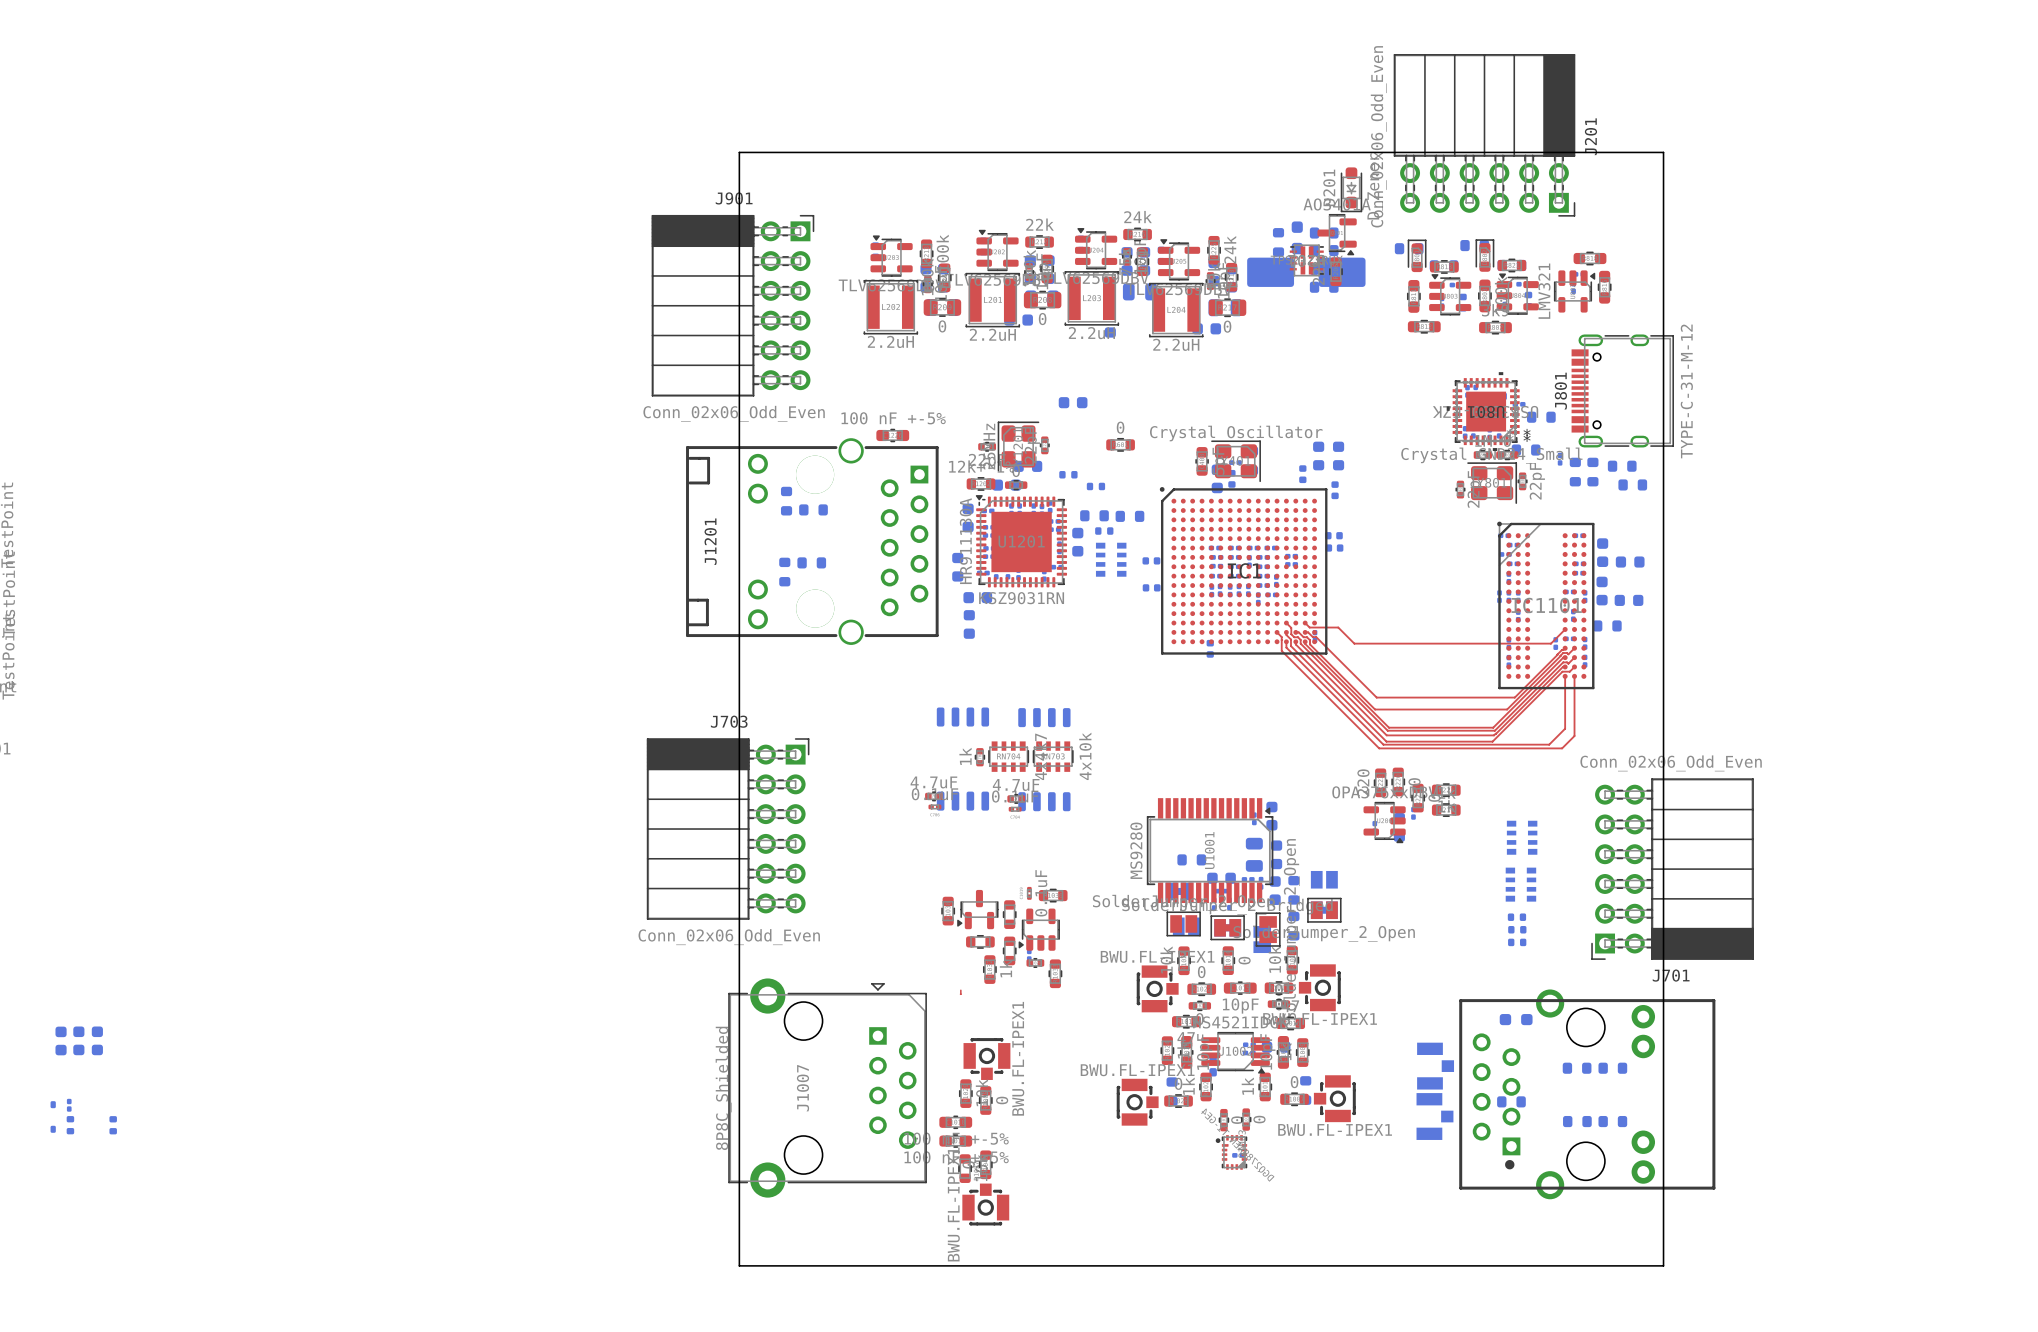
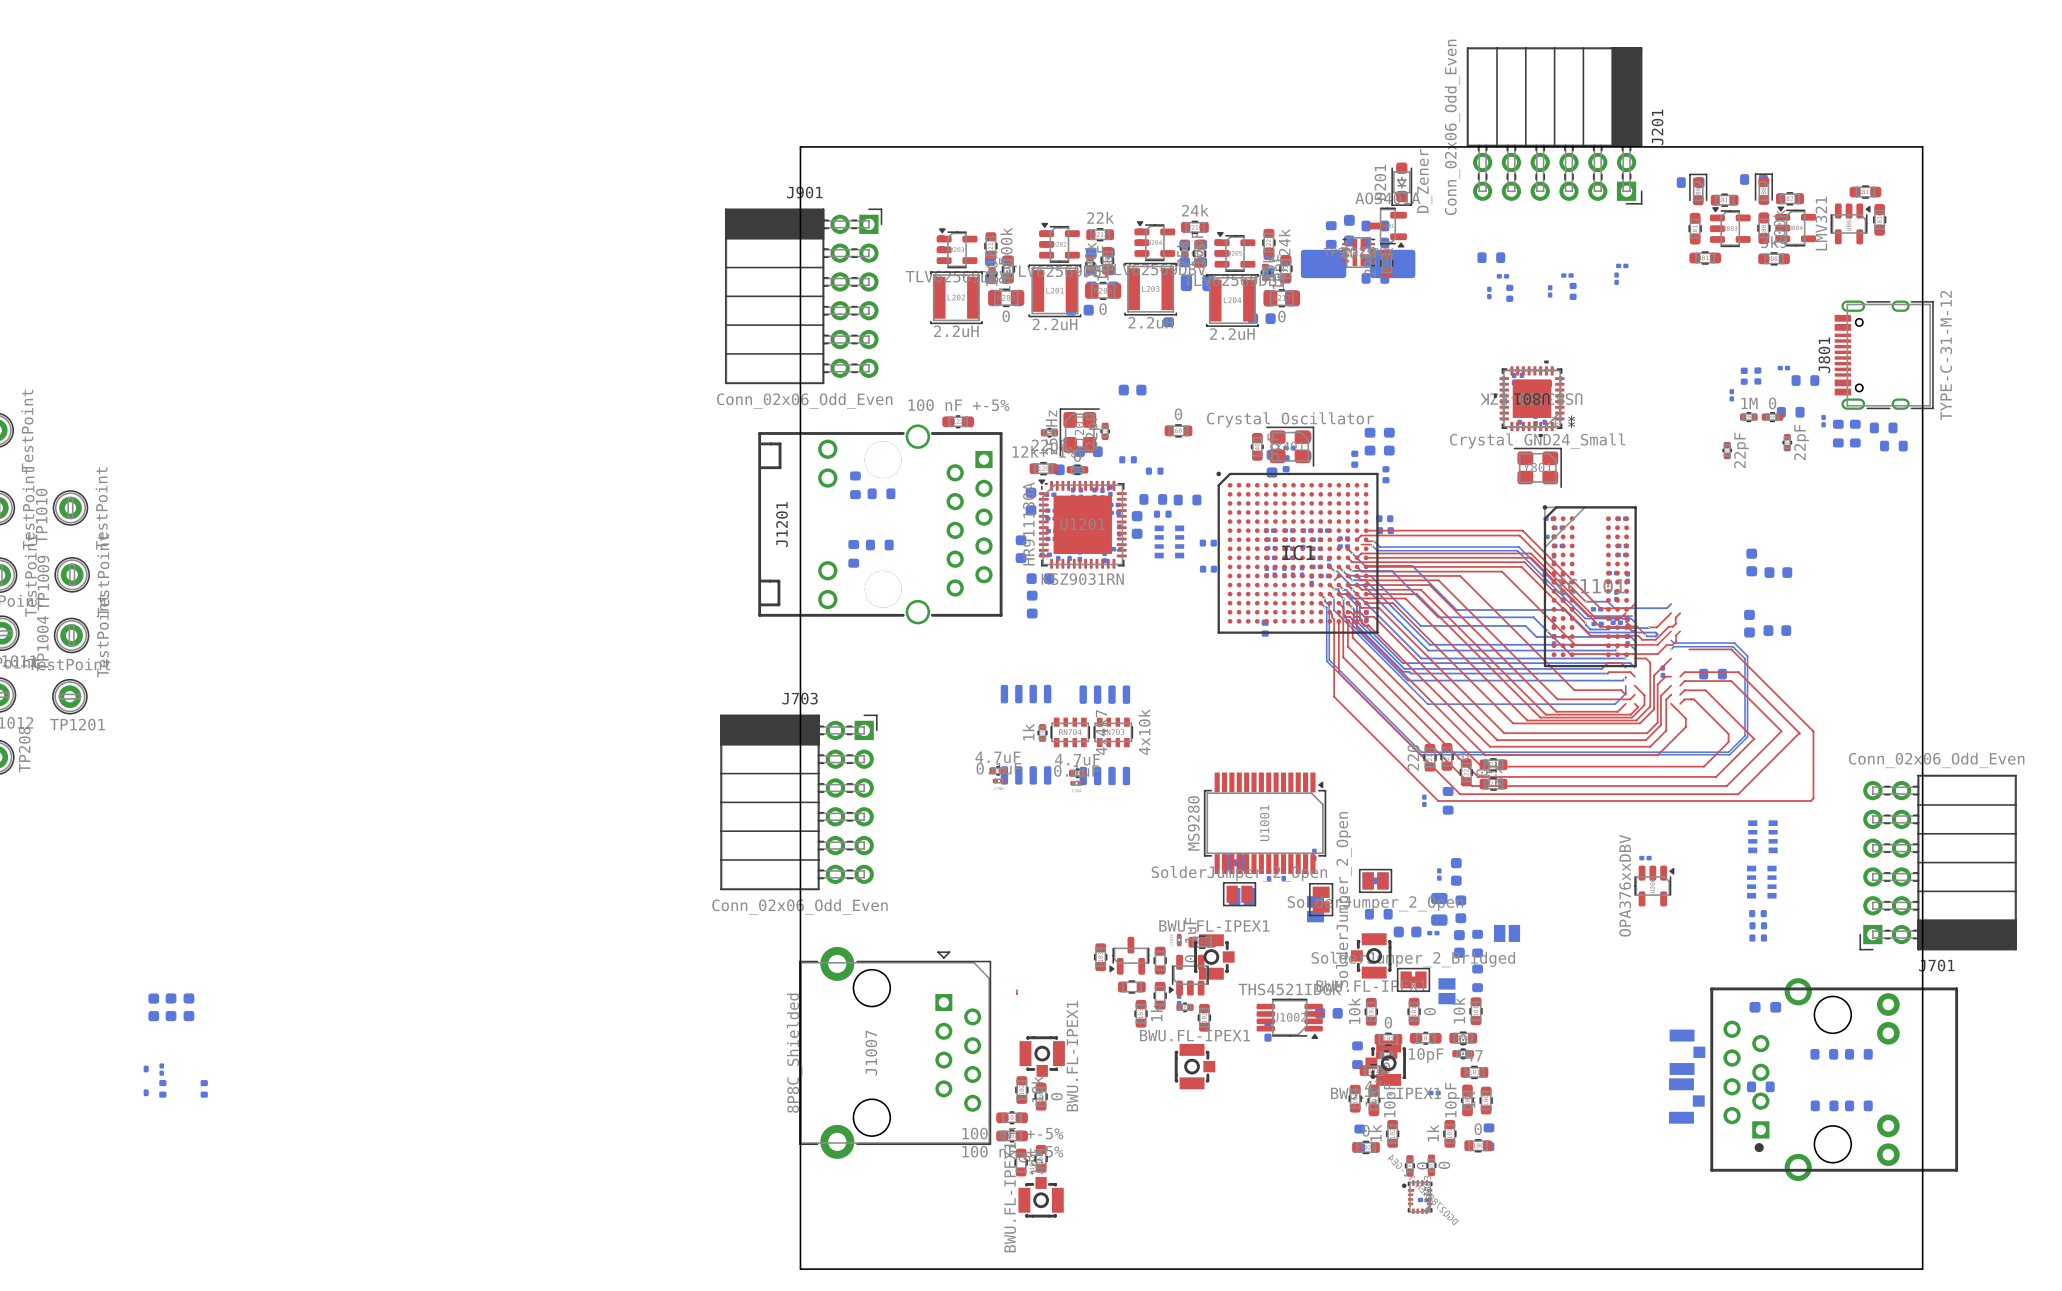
J201 position: (1484, 135) -> (1554, 125)
board edge: (739, 152) (1663, 152) (1663, 1265) (739, 1265) (739, 152) -> (800, 146) (800, 1269) (1922, 1269) (1922, 146) (800, 146)
part: none -> (1753, 179)
part: none -> (1690, 182)
part: (1474, 245) -> none
part: (1409, 248) -> none
part position: (1417, 255) -> (1698, 189)
part position: (1484, 255) -> (1763, 189)
part position: (1589, 258) -> (1865, 192)
part position: (1511, 265) -> (1789, 198)
part position: (1444, 266) -> (1724, 200)
part position: (1604, 287) -> (1879, 219)
part position: (1574, 291) -> (1850, 223)
part position: (1450, 294) -> (1730, 227)
part position: (1517, 294) -> (1795, 226)
part position: (1484, 295) -> (1763, 228)
part position: (1413, 296) -> (1695, 228)
part position: (1424, 326) -> (1705, 258)
part position: (1495, 327) -> (1774, 258)
part: none -> (1783, 368)
part: none -> (1744, 376)
part: none -> (1757, 376)
J801 position: (1622, 390) -> (1884, 355)
part: none -> (1805, 380)
part: (1519, 404) -> none
part: none -> (1731, 395)
part: (1541, 417) -> none
part: none -> (1790, 412)
part: (1465, 432) -> none
part: none -> (1823, 421)
part: none -> (1883, 427)
part: none -> (1838, 433)
part: none -> (1855, 433)
part: (1526, 450) -> none
part position: (1482, 455) -> (1748, 417)
part position: (1507, 455) -> (1772, 417)
part: (1560, 459) -> none
part: none -> (1893, 446)
part: (1622, 466) -> none
part: (1575, 472) -> none
part: (1592, 472) -> none
part position: (1522, 481) -> (1787, 442)
part: (1632, 484) -> none
part position: (1460, 489) -> (1727, 450)
top track: none -> (1366, 530) (1522, 530) (1600, 608) (1630, 608) (1634, 604)
part: (1602, 552) -> none
top track: none -> (1357, 539) (1361, 535) (1519, 535) (1585, 601)
top track: none -> (1366, 539) (1374, 541)
bottom track: none -> (1374, 541) (1380, 547) (1518, 547) (1587, 616) (1632, 616)
via: none -> (1374, 541)
top track: none -> (1361, 544) (1371, 544)
part: (1630, 562) -> none
bottom track: none -> (1372, 545) (1377, 550) (1517, 550) (1585, 618) (1631, 618) (1634, 622)
via: none -> (1372, 545)
top track: none -> (1347, 548) (1352, 553)
bottom track: none -> (1352, 553) (1364, 565) (1412, 565) (1456, 609) (1565, 609) (1588, 632) (1655, 632) (1657, 634) (1655, 636) (1645, 635)
via: none -> (1352, 553)
top track: none -> (1347, 557) (1352, 562) (1524, 562) (1585, 623)
top track: none -> (1357, 557) (1361, 553) (1530, 553) (1595, 617) (1621, 617) (1625, 613)
top track: none -> (1366, 557) (1531, 557) (1600, 626) (1627, 626) (1634, 631)
part: none -> (1751, 562)
top track: none -> (1330, 566) (1334, 571)
top track: none -> (1338, 566) (1343, 571)
top track: none -> (1347, 567) (1351, 570)
top track: none -> (1357, 566) (1361, 571) (1501, 571) (1575, 645) (1618, 645)
top track: none -> (1366, 566) (1521, 566) (1590, 635) (1638, 635) (1642, 639) (1655, 639) (1668, 626) (1672, 626) (1675, 623) (1675, 617) (1680, 613)
via: none -> (1334, 571)
bottom track: none -> (1336, 571) (1341, 575)
bottom track: none -> (1343, 571) (1348, 576) (1371, 576) (1420, 625) (1525, 625) (1536, 636) (1631, 636) (1634, 640)
via: none -> (1343, 571)
bottom track: none -> (1351, 570) (1391, 570) (1438, 617) (1533, 617) (1547, 631)
via: none -> (1351, 570)
part: (1602, 591) -> none
part: none -> (1778, 572)
top track: none -> (1338, 575) (1334, 580)
bottom track: none -> (1341, 575) (1350, 584)
top track: none -> (1348, 575) (1352, 580)
top track: none -> (1357, 575) (1361, 580) (1438, 580) (1557, 699) (1630, 699) (1634, 694)
top track: none -> (1366, 575) (1460, 575) (1574, 690) (1621, 690) (1625, 694)
bottom track: none -> (1352, 580) (1365, 580) (1429, 644) (1630, 644) (1634, 649)
via: none -> (1352, 580)
part: (1629, 600) -> none
top track: none -> (1329, 585) (1334, 589)
top track: none -> (1338, 585) (1343, 589)
top track: none -> (1347, 585) (1352, 589)
bottom track: none -> (1350, 585) (1362, 585) (1428, 650) (1616, 649)
top track: none -> (1357, 585) (1361, 589) (1420, 589) (1545, 714) (1630, 714) (1637, 707) (1634, 703)
top track: none -> (1366, 585) (1429, 585) (1556, 711) (1617, 711) (1625, 703)
bottom track: none -> (1334, 589) (1338, 589) (1341, 594) (1345, 593) (1356, 605) (1356, 621) (1404, 668) (1601, 668)
via: none -> (1334, 589)
bottom track: none -> (1343, 589) (1346, 589) (1359, 603) (1359, 620) (1402, 663) (1630, 663) (1634, 667)
via: none -> (1343, 589)
bottom track: none -> (1352, 589) (1421, 658) (1625, 658)
via: none -> (1352, 589)
top track: none -> (1320, 594) (1324, 598)
top track: none -> (1329, 594) (1334, 598)
top track: none -> (1347, 594) (1352, 598) (1405, 598) (1527, 720) (1636, 720) (1650, 706) (1650, 662) (1646, 658) (1634, 658)
top track: none -> (1366, 594) (1416, 594) (1540, 717) (1631, 717) (1644, 705) (1644, 695) (1634, 685)
top track: none -> (1338, 594) (1343, 598)
bottom track: none -> (1324, 598) (1329, 605) (1329, 660) (1421, 752) (1728, 752) (1745, 735) (1745, 658) (1732, 646) (1673, 646) (1671, 649)
via: none -> (1324, 598)
bottom track: none -> (1334, 598) (1334, 610) (1427, 704) (1615, 704) (1625, 693) (1625, 685)
via: none -> (1334, 598)
bottom track: none -> (1343, 598) (1343, 616) (1407, 680) (1622, 680) (1624, 679)
via: none -> (1343, 598)
bottom track: none -> (1585, 601) (1607, 601) (1614, 608) (1666, 608) (1671, 604)
via: none -> (1585, 601)
top track: none -> (1320, 603) (1324, 607)
top track: none -> (1347, 603) (1352, 607)
top track: none -> (1366, 603) (1392, 603) (1513, 723) (1639, 723) (1654, 709) (1654, 675) (1671, 658)
part position: (1607, 625) -> (1713, 674)
bottom track: none -> (1324, 607) (1326, 607) (1326, 661) (1420, 754) (1729, 754) (1747, 736) (1747, 656) (1734, 643) (1673, 643) (1671, 640)
via: none -> (1324, 607)
bottom track: none -> (1352, 607) (1354, 609) (1354, 622) (1403, 671) (1410, 673) (1608, 672)
via: none -> (1352, 607)
top track: (1309, 627) (1338, 627) (1354, 643) (1550, 643) (1565, 629) -> (1361, 607) (1378, 607) (1504, 733) (1647, 733) (1657, 722) (1657, 684) (1665, 676) (1671, 676)
part: none -> (1597, 609)
top track: none -> (1671, 613) (1656, 627) (1649, 627)
top track: (1279, 634) (1281, 637) (1281, 650) (1379, 748) (1562, 748) (1574, 736) (1574, 676) -> (1332, 614) (1334, 619) (1334, 696) (1438, 800) (1810, 800) (1813, 798) (1813, 731) (1731, 649) (1689, 649)
top track: (1286, 634) (1290, 639) (1290, 646) (1386, 741) (1492, 741) (1562, 671) (1569, 671) (1574, 666) -> (1338, 614) (1343, 619) (1343, 657) (1471, 786) (1726, 786) (1781, 731) (1731, 681) (1684, 681) (1680, 685)
top track: (1316, 637) (1376, 697) (1514, 697) (1565, 648) -> (1367, 616) (1373, 616) (1497, 740) (1645, 740) (1660, 725) (1660, 695) (1671, 685)
top track: none -> (1625, 622) (1630, 626) (1637, 626) (1645, 635)
top track: (1300, 643) (1387, 730) (1494, 730) (1563, 662) (1568, 663) (1574, 657) -> (1352, 623) (1352, 637) (1481, 766) (1703, 766) (1728, 742) (1728, 733) (1694, 699) (1684, 699) (1680, 703)
top track: (1305, 643) (1388, 727) (1493, 727) (1565, 657) -> (1357, 623) (1357, 627) (1484, 754) (1657, 754) (1685, 727) (1685, 718) (1671, 703)
top track: (1310, 643) (1375, 709) (1507, 709) (1563, 653) (1568, 654) (1574, 648) -> (1361, 623) (1364, 625) (1368, 625) (1489, 746) (1650, 746) (1666, 730) (1666, 699) (1671, 694)
bottom track: none -> (1585, 623) (1590, 629) (1649, 627)
via: none -> (1585, 623)
part rotation: 0° (1555, 643) -> 90° clockwise (1597, 623)
part: none -> (1616, 622)
top track: (1295, 644) (1386, 735) (1494, 735) (1562, 666) (1565, 666) -> (1347, 623) (1347, 646) (1478, 776) (1716, 776) (1754, 738) (1705, 690) (1684, 690) (1680, 694)
part: none -> (1749, 623)
top track: (1286, 647) (1383, 744) (1549, 744) (1565, 728) (1565, 676) -> (1338, 626) (1338, 672) (1460, 794) (1738, 794) (1799, 733) (1738, 672) (1684, 672) (1680, 676)
via: none -> (1649, 627)
part: none -> (1777, 630)
via: none -> (1547, 631)
top track: none -> (1671, 631) (1657, 644) (1618, 644)
top track: none -> (1680, 631) (1676, 635) (1676, 641) (1672, 645) (1666, 645) (1657, 654) (1570, 654) (1547, 631)
via: none -> (1645, 635)
via: none -> (1616, 649)
via: none -> (1671, 649)
via: none -> (1625, 658)
top track: none -> (1625, 667) (1621, 663) (1607, 663) (1601, 668)
part: none -> (1662, 671)
top track: none -> (1608, 672) (1630, 672) (1634, 676)
top track: none -> (1625, 676) (1624, 679)
via: none -> (1624, 679)
part: (1413, 813) -> none
part: (1271, 816) -> none
part: (1254, 818) -> none
part rotation: 0° (1384, 822) -> 90° counterclockwise (1654, 886)
part position: (1384, 822) -> (1654, 886)
part: (1522, 837) -> none
part position: (1254, 854) -> (1439, 909)
part position: (1276, 854) -> (1460, 909)
part: (1191, 859) -> none
part: none -> (1762, 836)
J701 position: (1672, 869) -> (1938, 862)
part: (1221, 878) -> none
part: (1248, 879) -> none
part: (1324, 879) -> none
part: (1520, 884) -> none
part: none -> (1645, 858)
part: (1275, 890) -> none
part: (1293, 890) -> none
part: (1221, 891) -> none
part position: (1029, 893) -> (1179, 940)
part position: (1053, 895) -> (1202, 942)
part: none -> (1456, 871)
part: none -> (1439, 874)
part position: (977, 909) -> (1129, 955)
part position: (948, 911) -> (1100, 957)
part: none -> (1761, 882)
part: (1009, 914) -> none
part: (1516, 917) -> none
part: (1293, 926) -> none
part position: (1227, 927) -> (1413, 979)
part position: (1039, 929) -> (1188, 975)
part: (1517, 929) -> none
part: (980, 941) -> none
part: (1517, 942) -> none
part: none -> (1378, 914)
part: none -> (1757, 913)
part: (1009, 950) -> none
part: (1029, 955) -> none
part: none -> (1758, 925)
part position: (1184, 960) -> (1371, 1011)
part position: (1228, 960) -> (1414, 1011)
part position: (1292, 960) -> (1476, 1011)
part position: (1035, 962) -> (1185, 1007)
part: none -> (1407, 931)
part: none -> (1433, 933)
part: none -> (1507, 933)
part position: (989, 969) -> (1141, 1013)
part: none -> (1758, 938)
part position: (1055, 973) -> (1204, 1017)
part: none -> (1459, 943)
part: none -> (1477, 943)
part position: (1240, 988) -> (1425, 1038)
part position: (1279, 988) -> (1463, 1038)
part position: (1201, 989) -> (1388, 1039)
top track: (960, 990) (960, 994) -> (1016, 990) (1016, 993)
part: none -> (1160, 960)
part position: (1278, 1004) -> (1463, 1053)
part position: (1199, 1005) -> (1386, 1055)
part: none -> (1477, 978)
part: none -> (1131, 987)
part position: (1516, 1019) -> (1765, 1007)
part position: (1186, 1021) -> (1373, 1070)
part position: (1290, 1023) -> (1474, 1072)
part: none -> (1446, 991)
part: none -> (1160, 995)
part: none -> (1179, 999)
part: (1249, 1044) -> none
part position: (1167, 1050) -> (1355, 1098)
part position: (1186, 1052) -> (1373, 1100)
part: (1249, 1052) -> none
part position: (1283, 1052) -> (1467, 1100)
part position: (1302, 1052) -> (1486, 1100)
part position: (986, 1059) -> (1042, 1056)
part: (1435, 1066) -> none
part: (1577, 1068) -> none
part: (1612, 1068) -> none
part position: (1206, 1086) -> (1392, 1133)
part position: (1265, 1086) -> (1449, 1133)
part: none -> (1687, 1052)
part: none -> (1824, 1054)
part: none -> (1858, 1054)
part: (1172, 1091) -> none
part position: (965, 1093) -> (1021, 1090)
part position: (1587, 1094) -> (1834, 1079)
part position: (1294, 1099) -> (1478, 1145)
part position: (985, 1100) -> (1041, 1096)
part position: (1178, 1101) -> (1366, 1147)
part: (1511, 1101) -> none
part: (1434, 1116) -> none
part position: (1246, 1119) -> (1431, 1165)
part position: (1223, 1120) -> (1409, 1165)
part: (1577, 1121) -> none
part: (1612, 1121) -> none
part position: (955, 1122) -> (1012, 1117)
part: none -> (1760, 1086)
part: none -> (1434, 1093)
part: none -> (1686, 1101)
part position: (955, 1141) -> (1012, 1135)
part: none -> (1824, 1105)
part: none -> (1858, 1105)
part position: (1231, 1152) -> (1417, 1197)
part: (1238, 1155) -> none
part position: (985, 1164) -> (1041, 1158)
part position: (965, 1168) -> (1021, 1162)
part: none -> (1488, 1137)
part: none -> (1359, 1138)
part position: (985, 1204) -> (1041, 1197)
part: none -> (1424, 1200)

